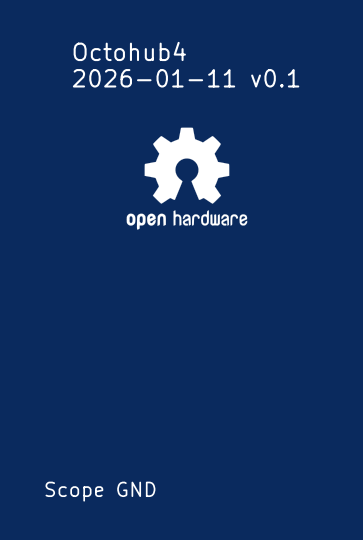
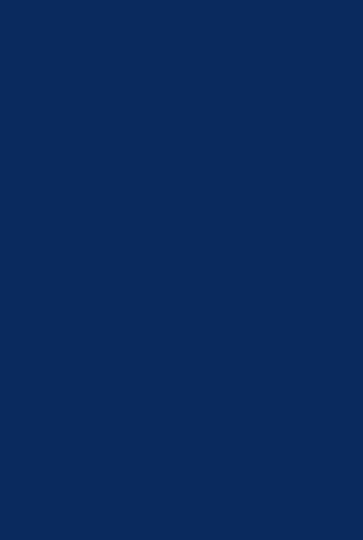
text: Octohub4 (129, 51) -> none
text: 2026-01-11 v0.1 (186, 78) -> none
drawing: [126, 127, 248, 230] -> none
text: Scope GND (100, 491) -> none

